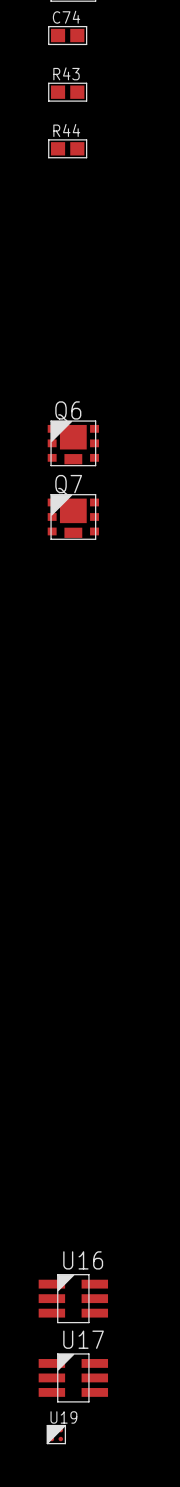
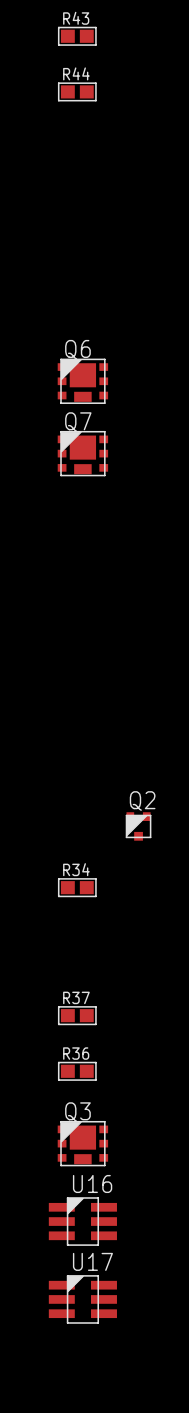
Q2: none -> (138, 826)
R34: none -> (77, 887)
R37: none -> (77, 1015)
R36: none -> (77, 1071)
Q3: none -> (82, 1143)
U19: (56, 1434) -> none

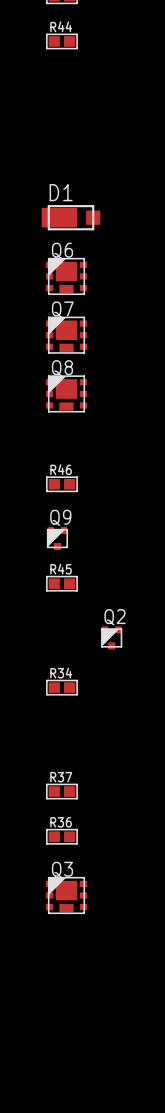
D1: none -> (71, 217)
Q8: none -> (66, 393)
R46: none -> (61, 484)
Q9: none -> (57, 538)
R45: none -> (61, 583)
U16: (82, 1221) -> none
U17: (82, 1299) -> none

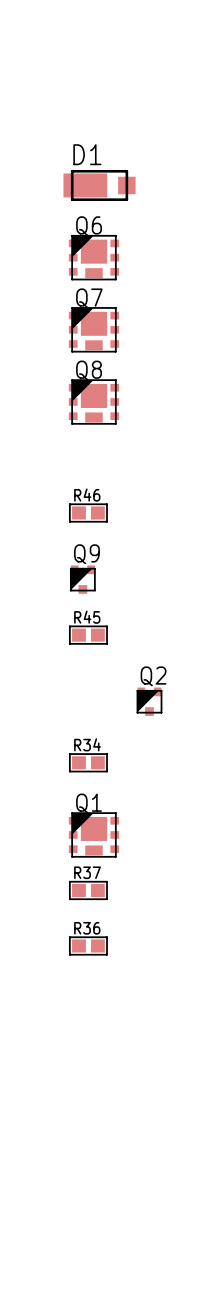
Q1: none -> (93, 834)
Q3: (66, 895) -> none

